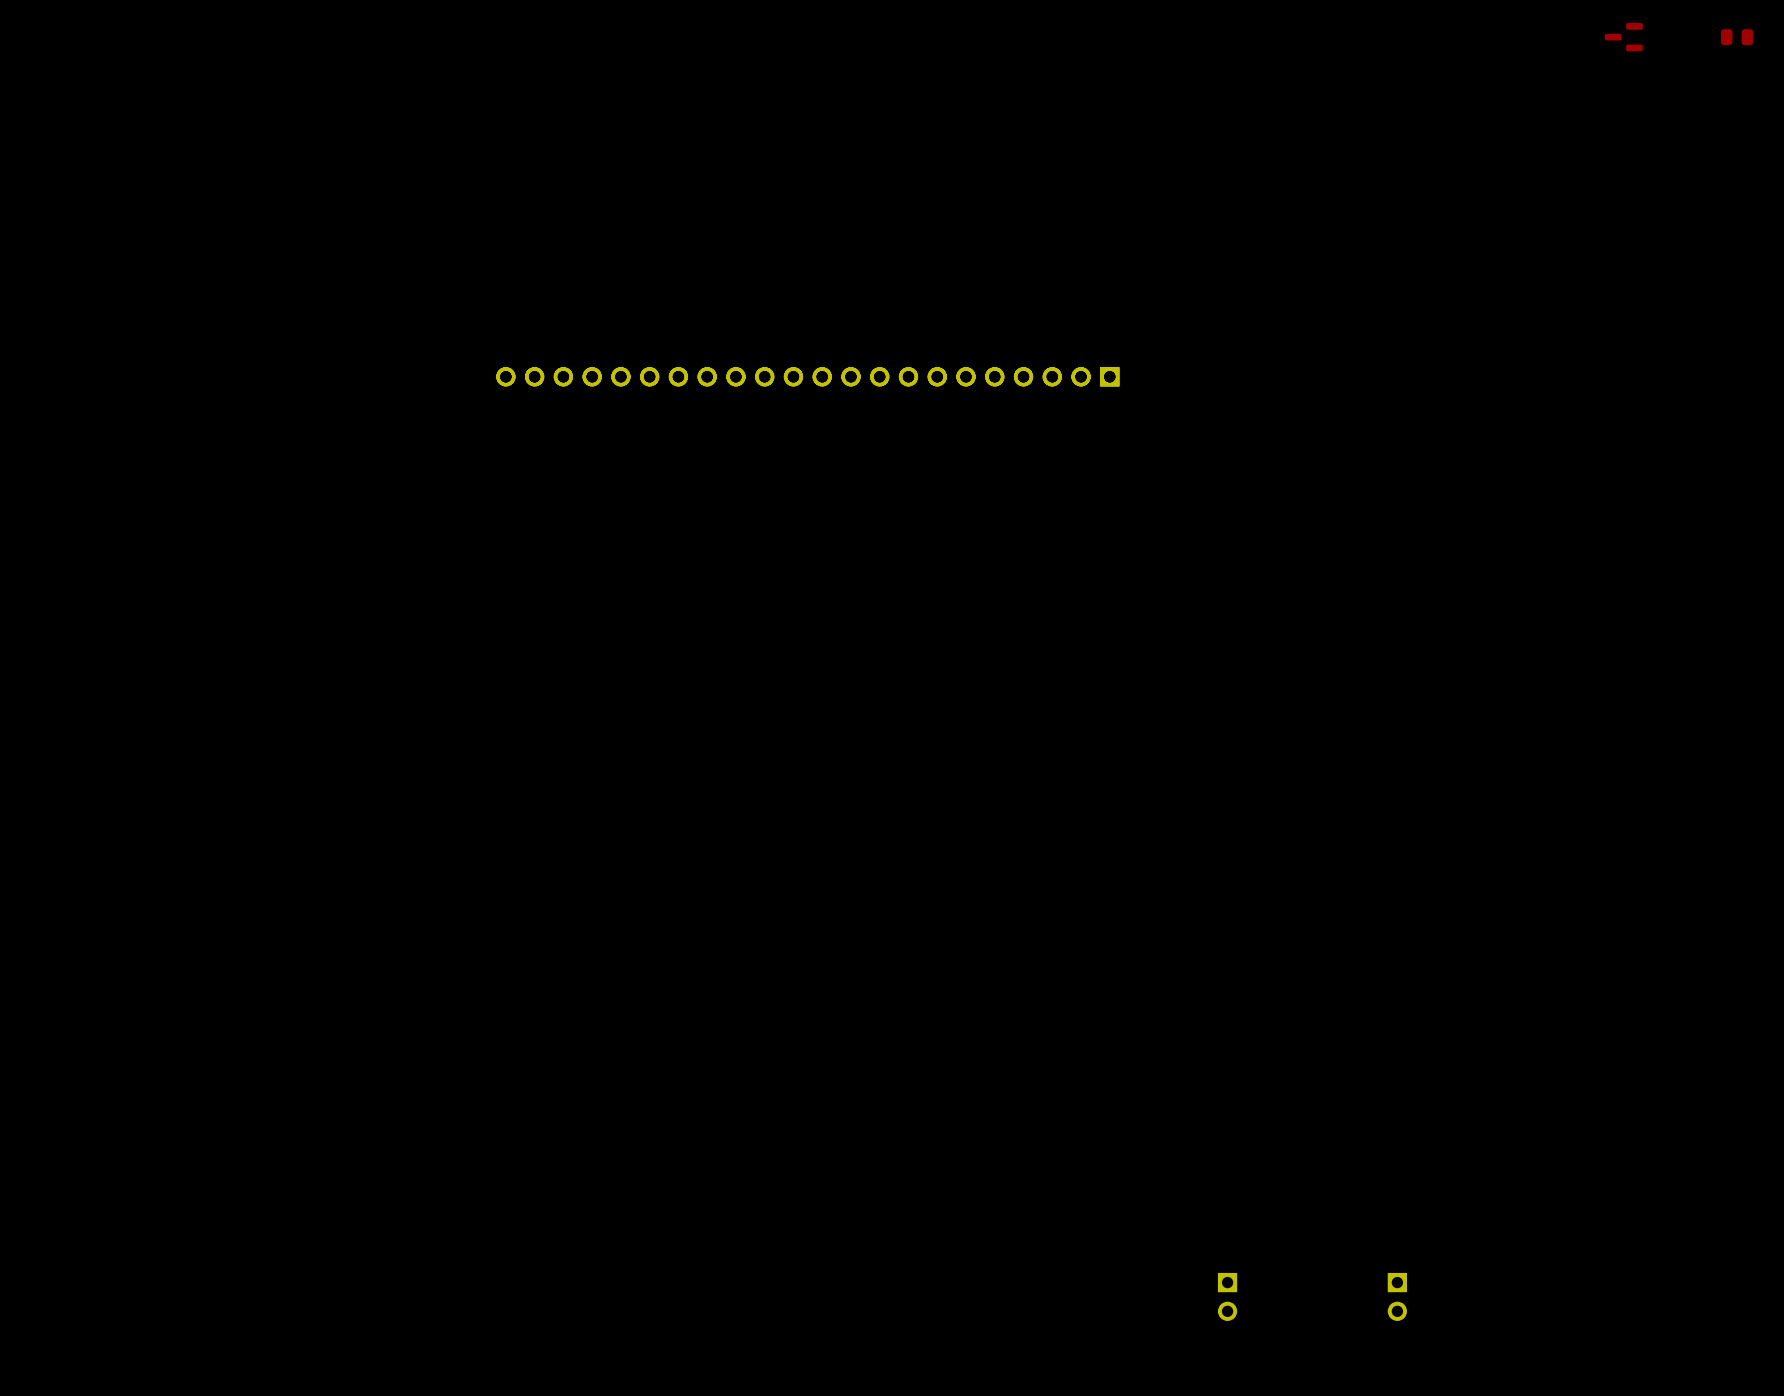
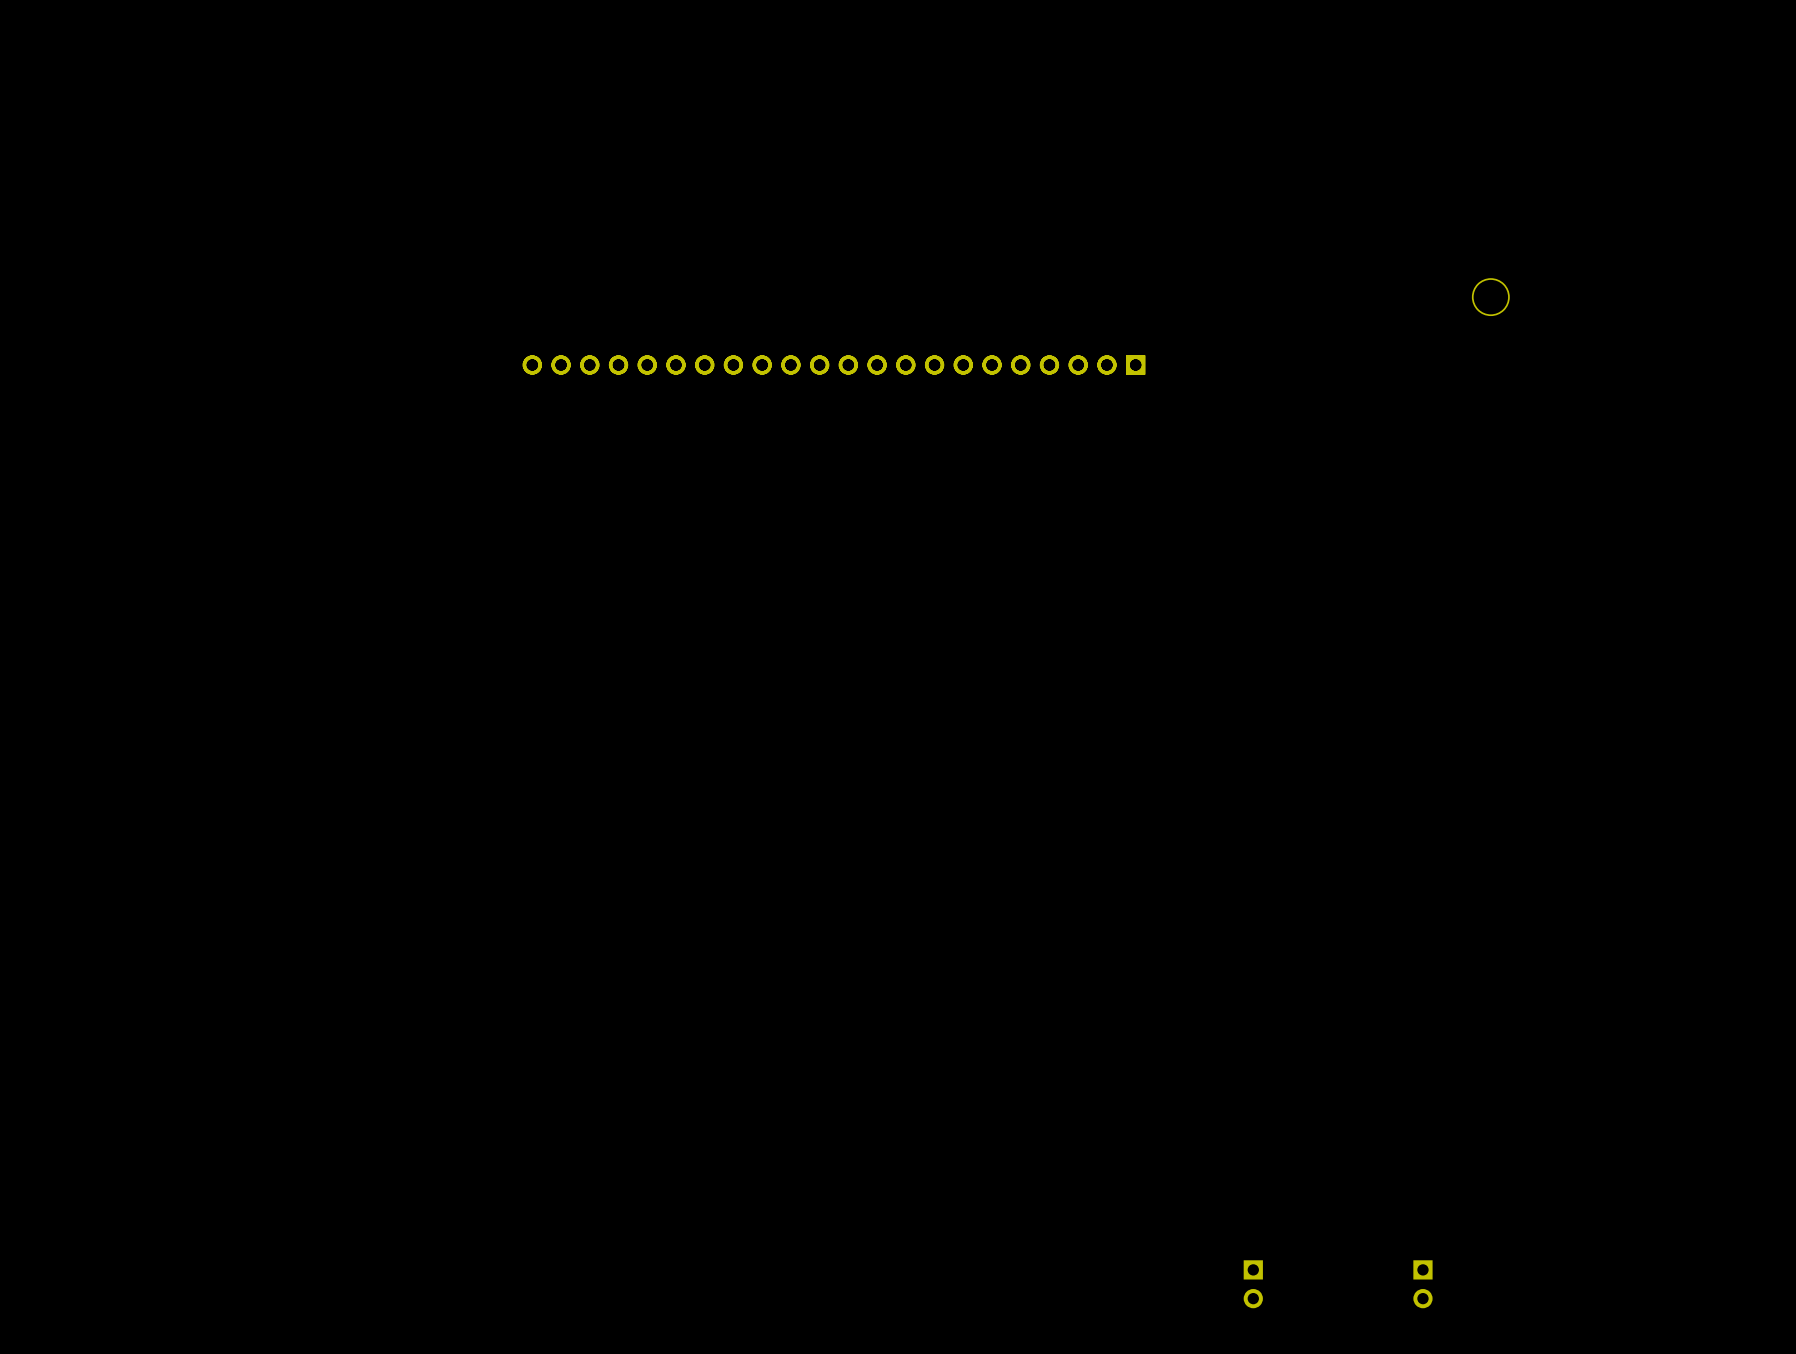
part: (1623, 37) -> none
part: (1737, 37) -> none
round board edge: none -> [1471, 278, 1510, 317]

